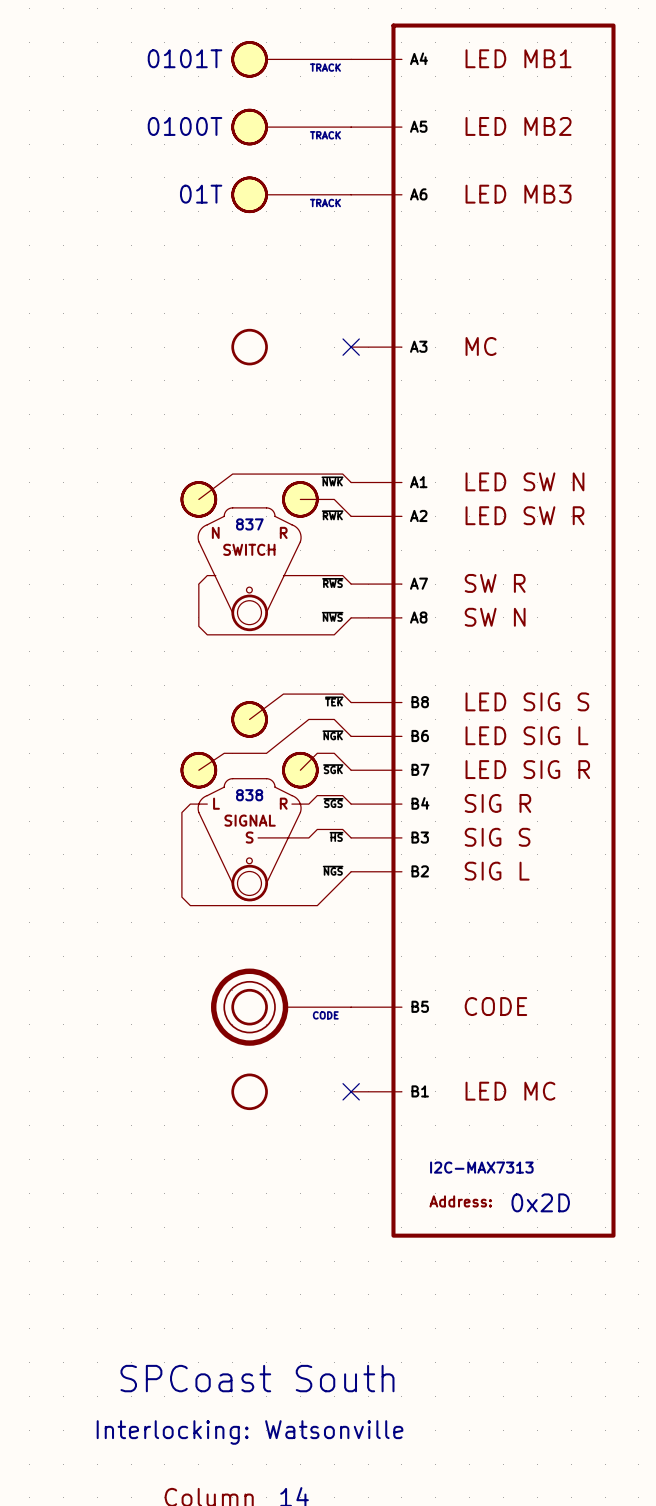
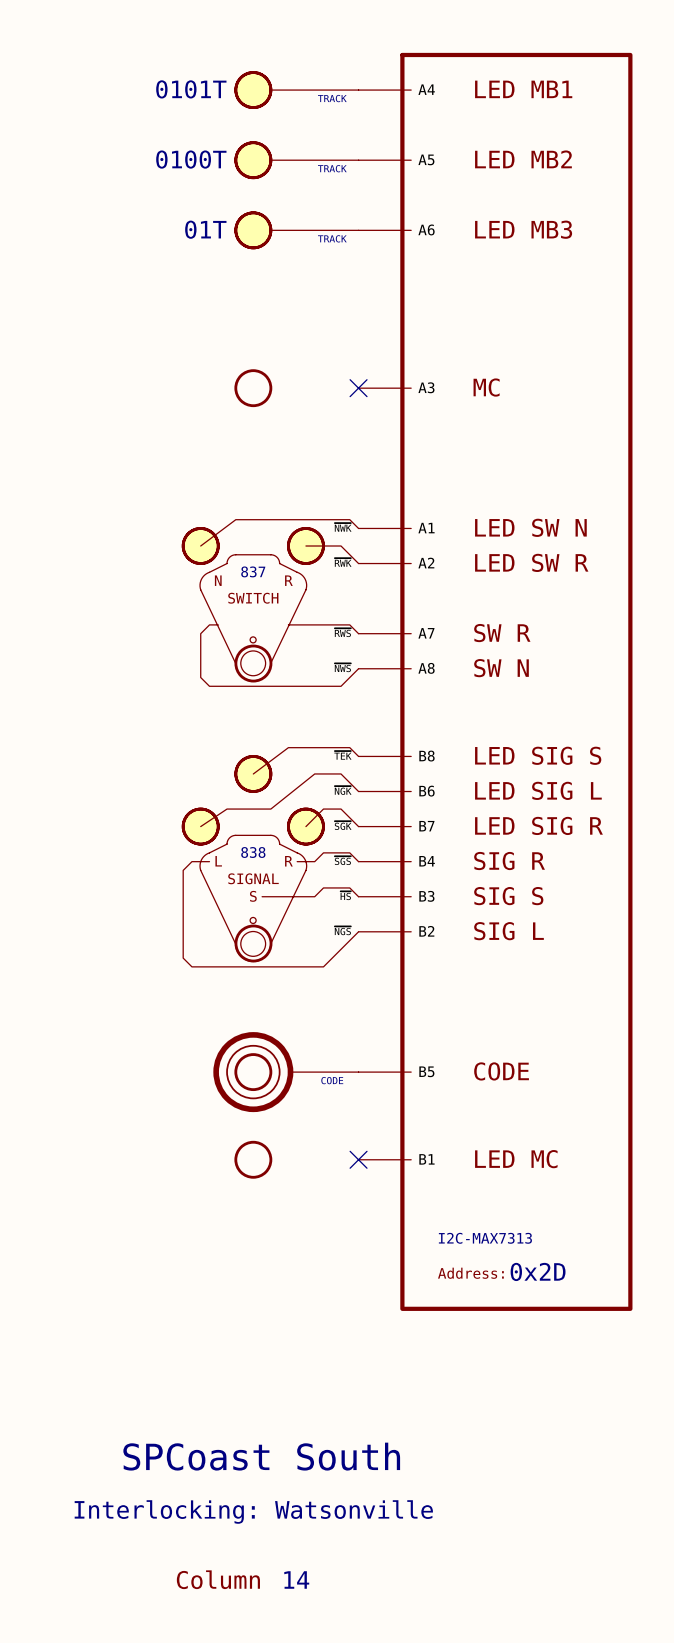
part text position: 0x2D (540, 1202) -> 0x2D (538, 1271)

